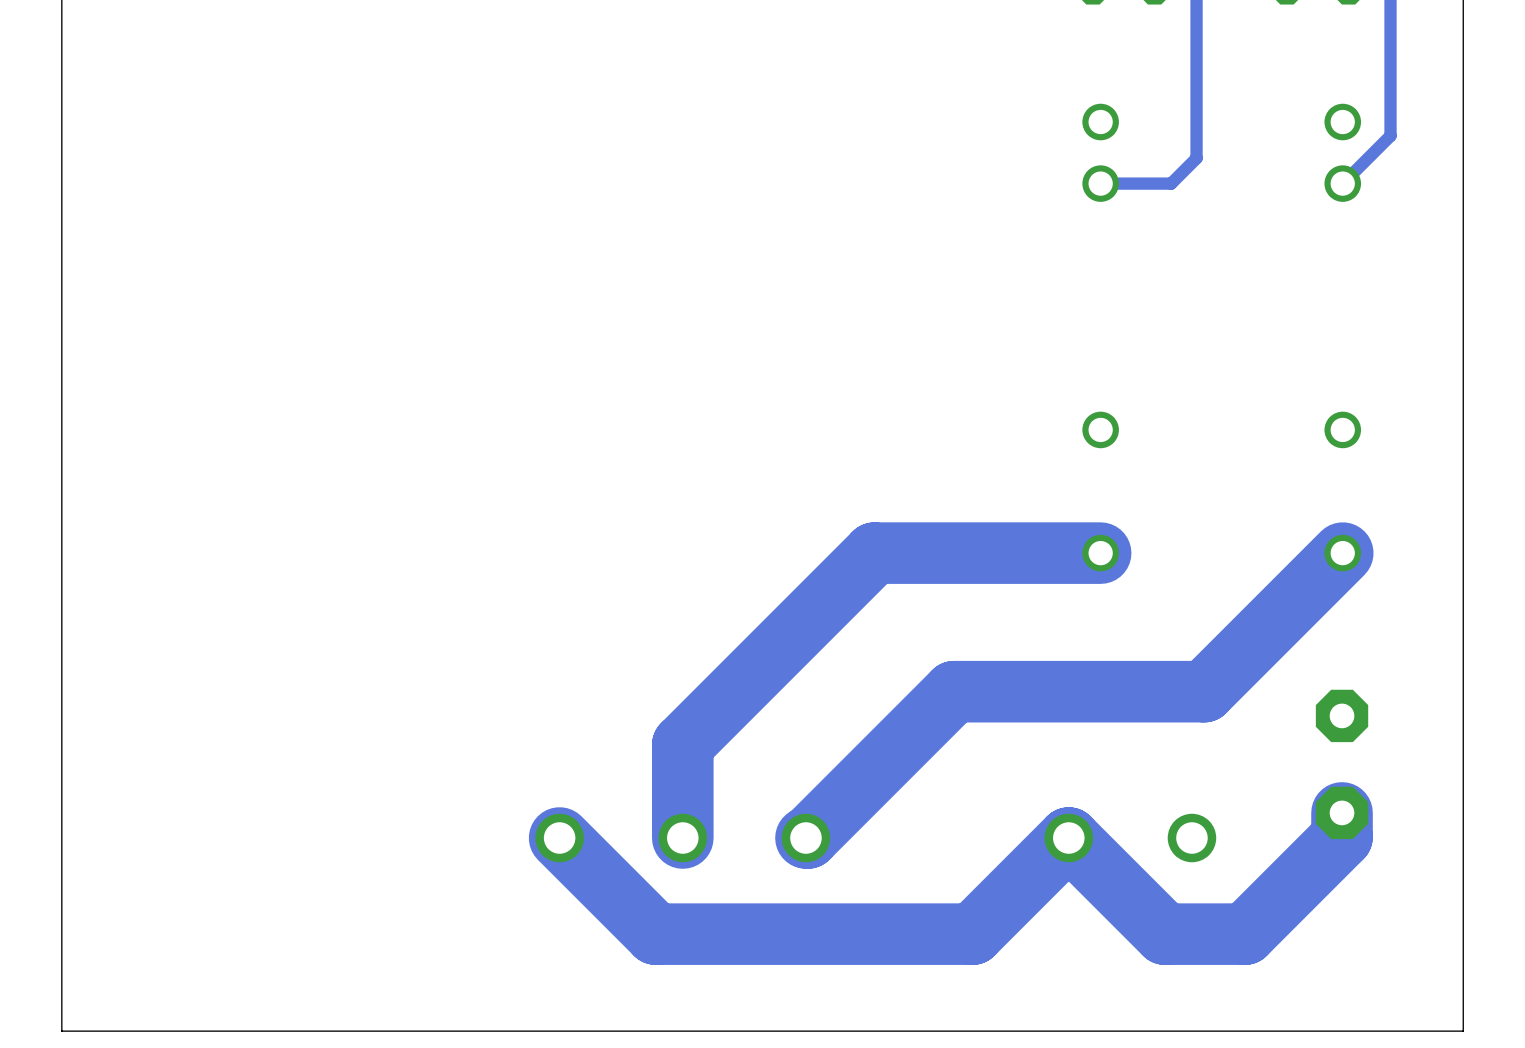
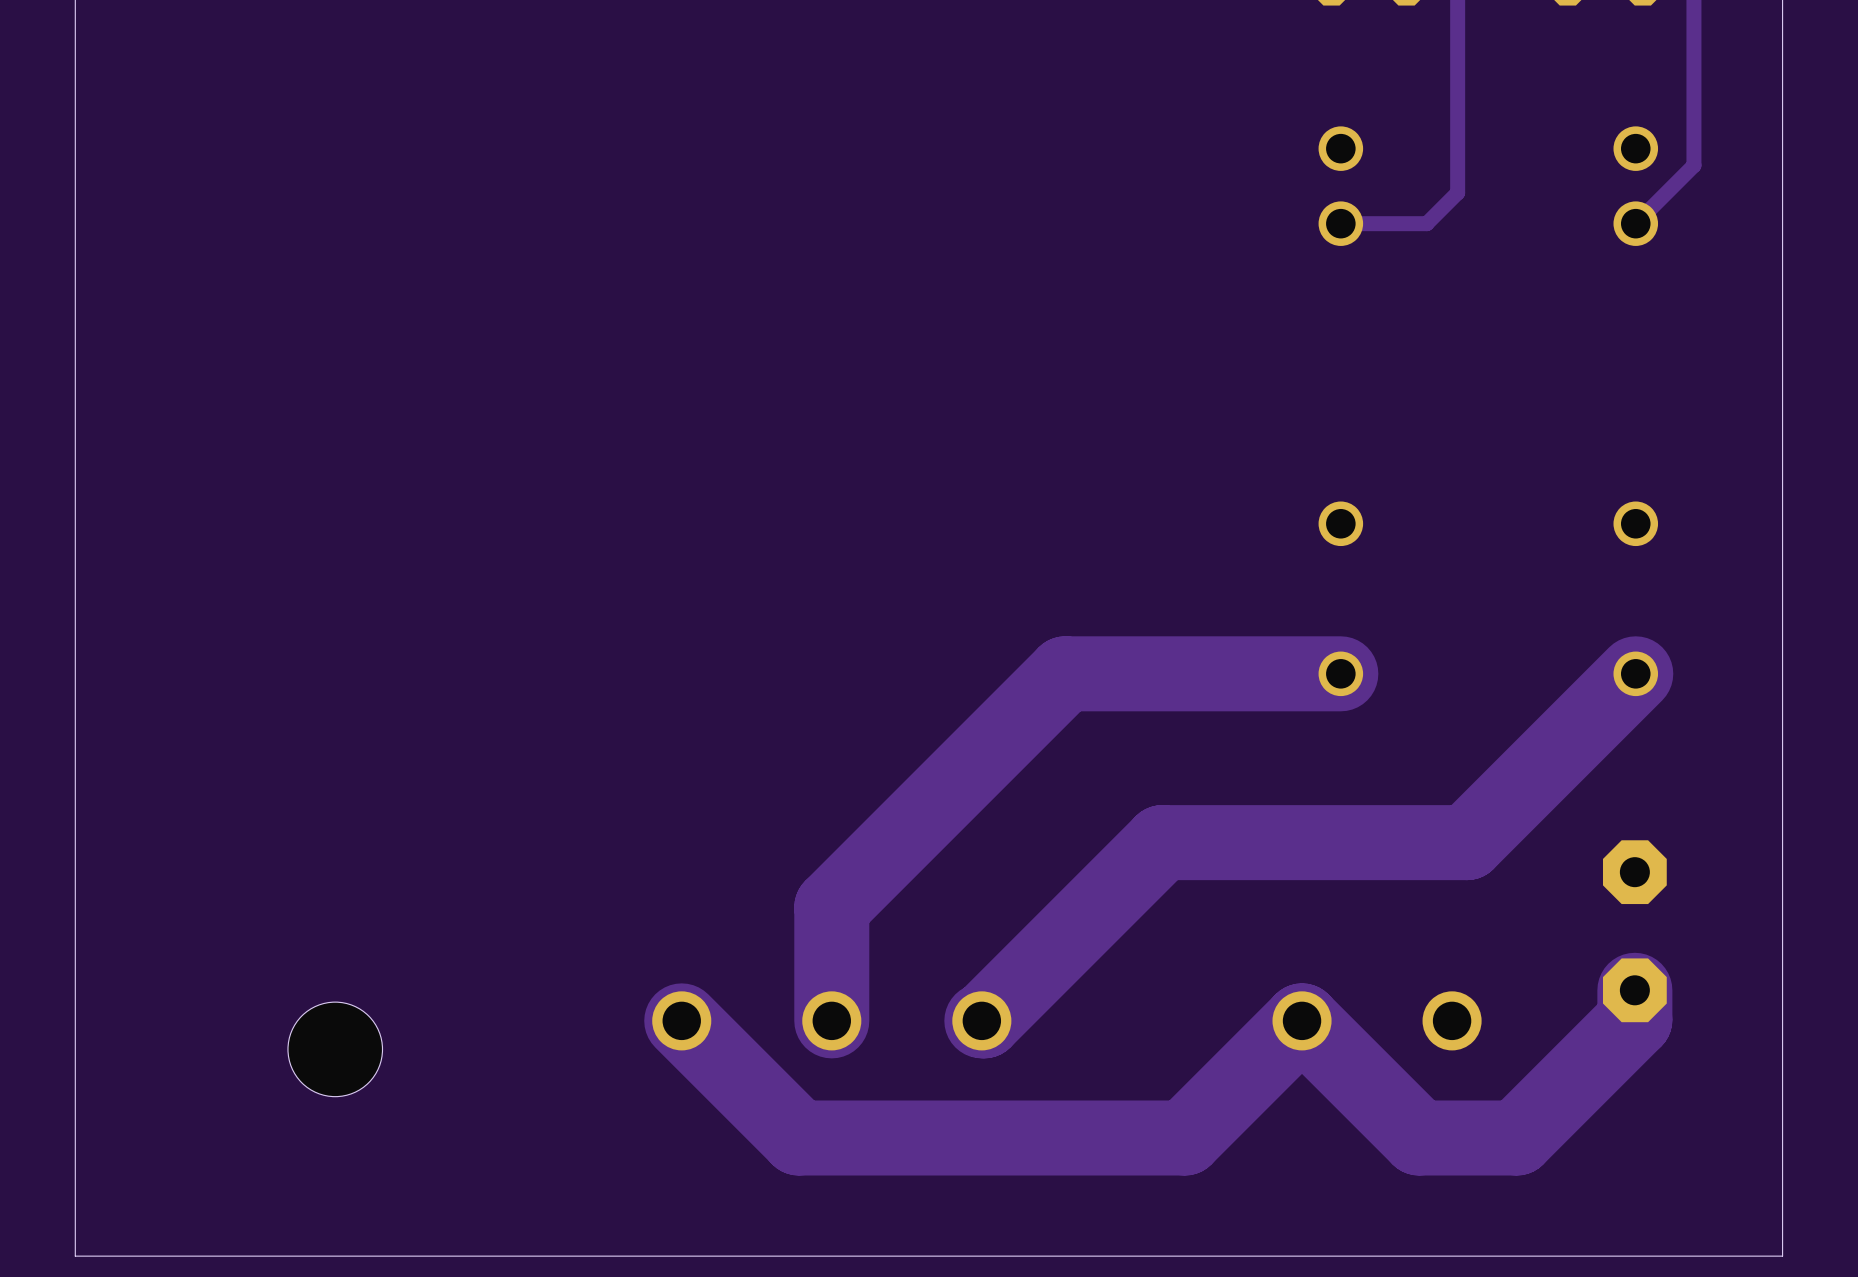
hole: none -> (335, 1049)

